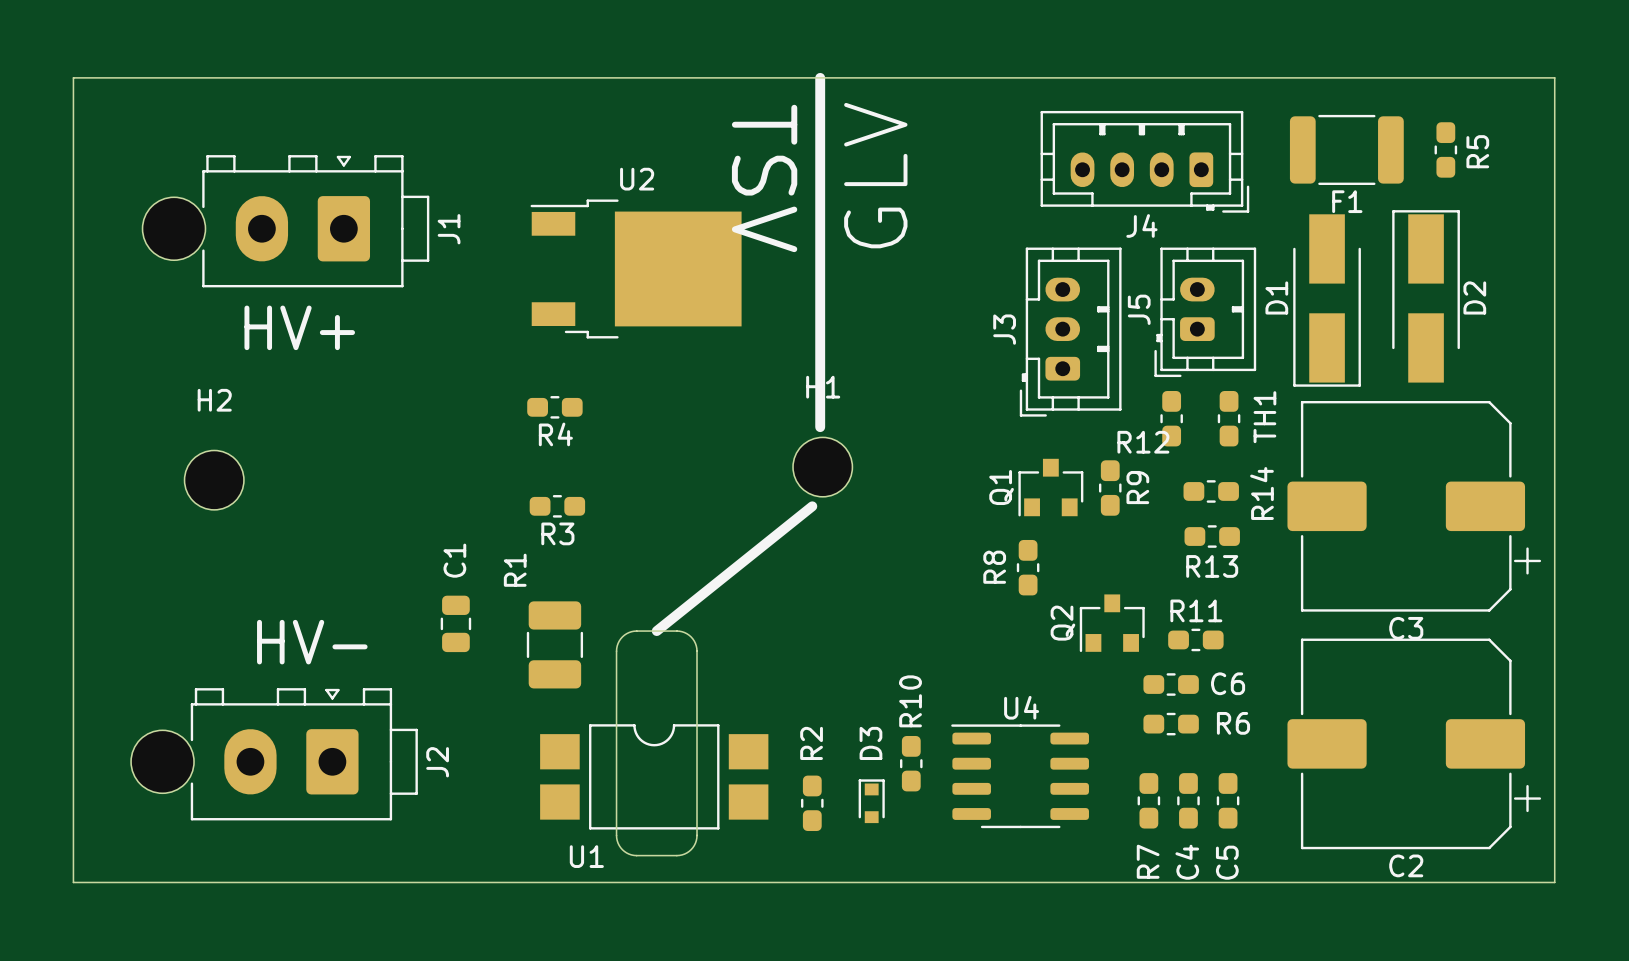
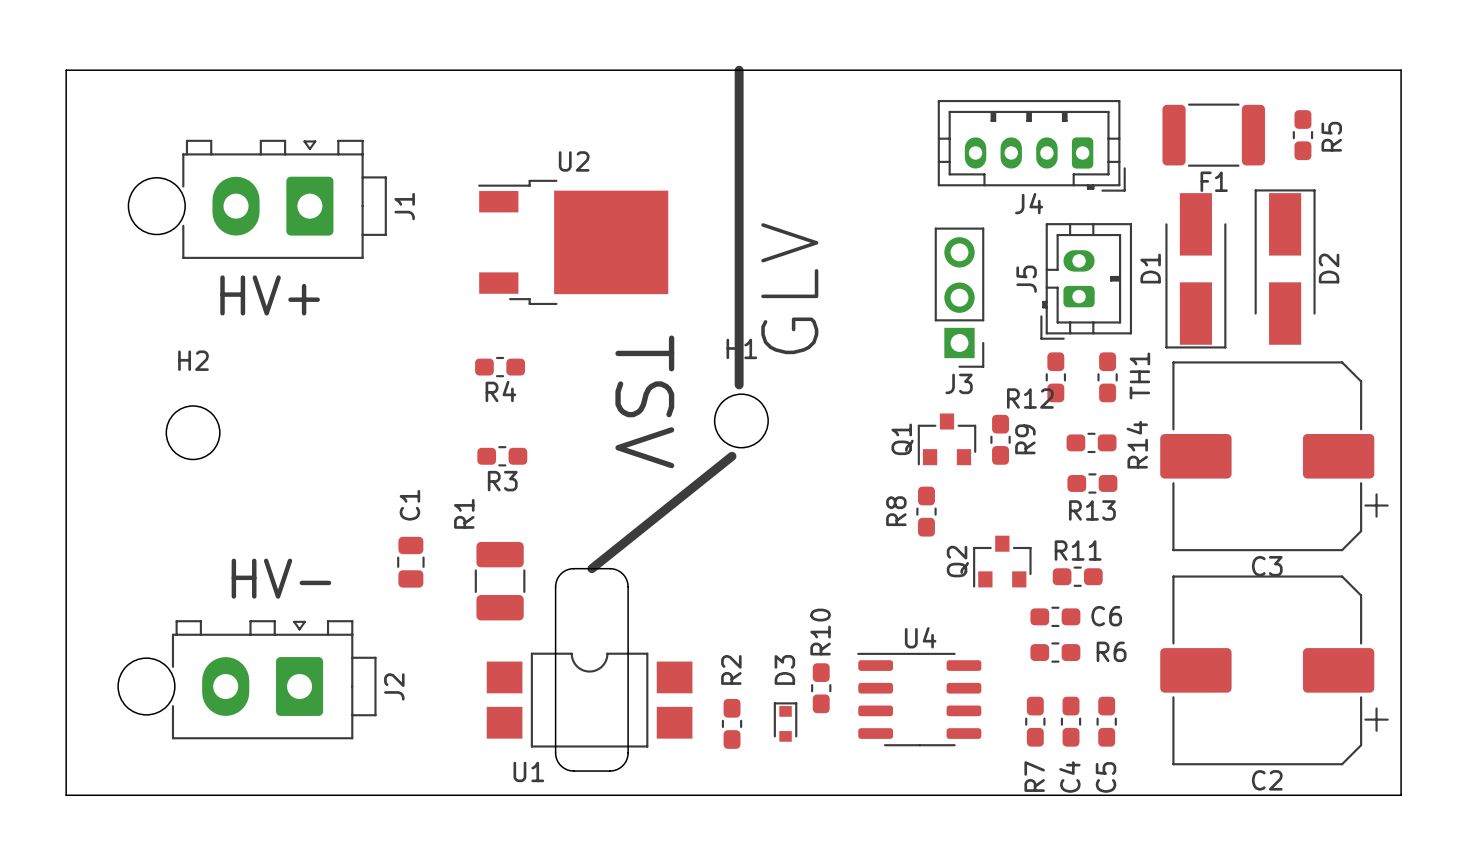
text position: GLV (875, 175) -> GLV (789, 288)
text position: TSV (764, 178) -> TSV (644, 401)
J3 footprint: [1019, 247, 1122, 417] -> [934, 227, 985, 368]
J3 name position: J3 (1004, 329) -> J3 (959, 383)

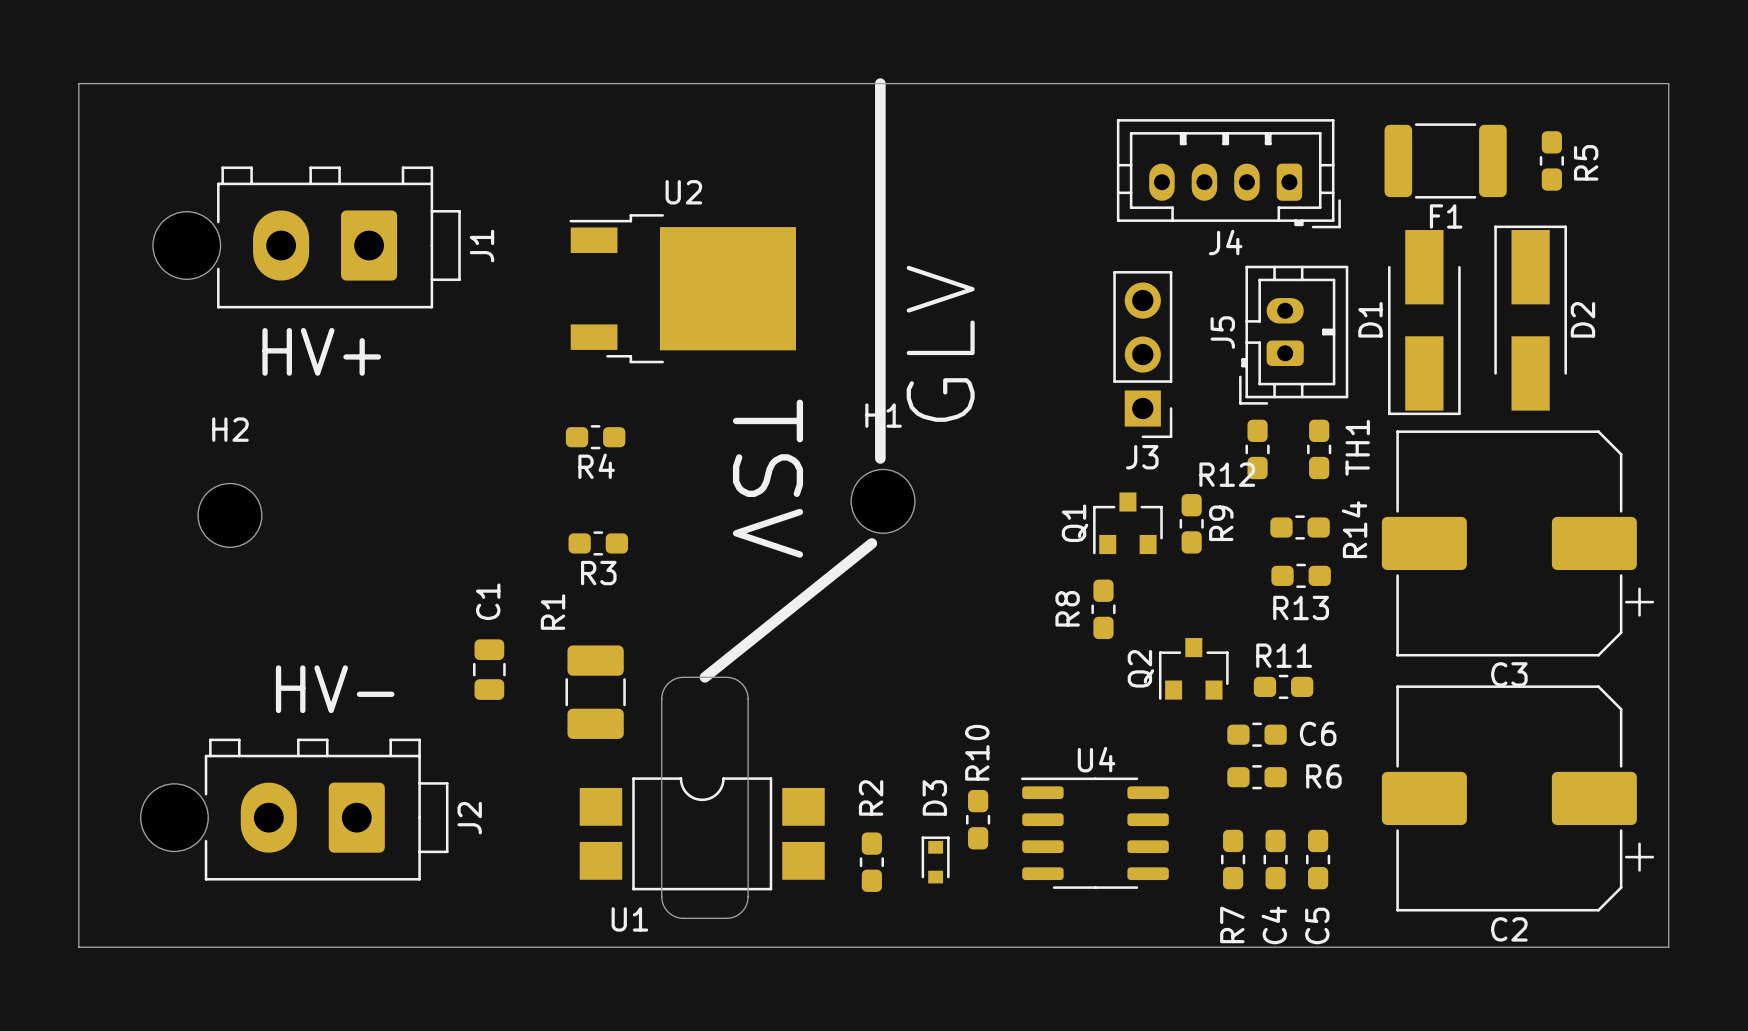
J1 footprint: [128, 139, 387, 259] -> [152, 166, 461, 309]
J2 footprint: [118, 620, 377, 740] -> [140, 738, 449, 881]

